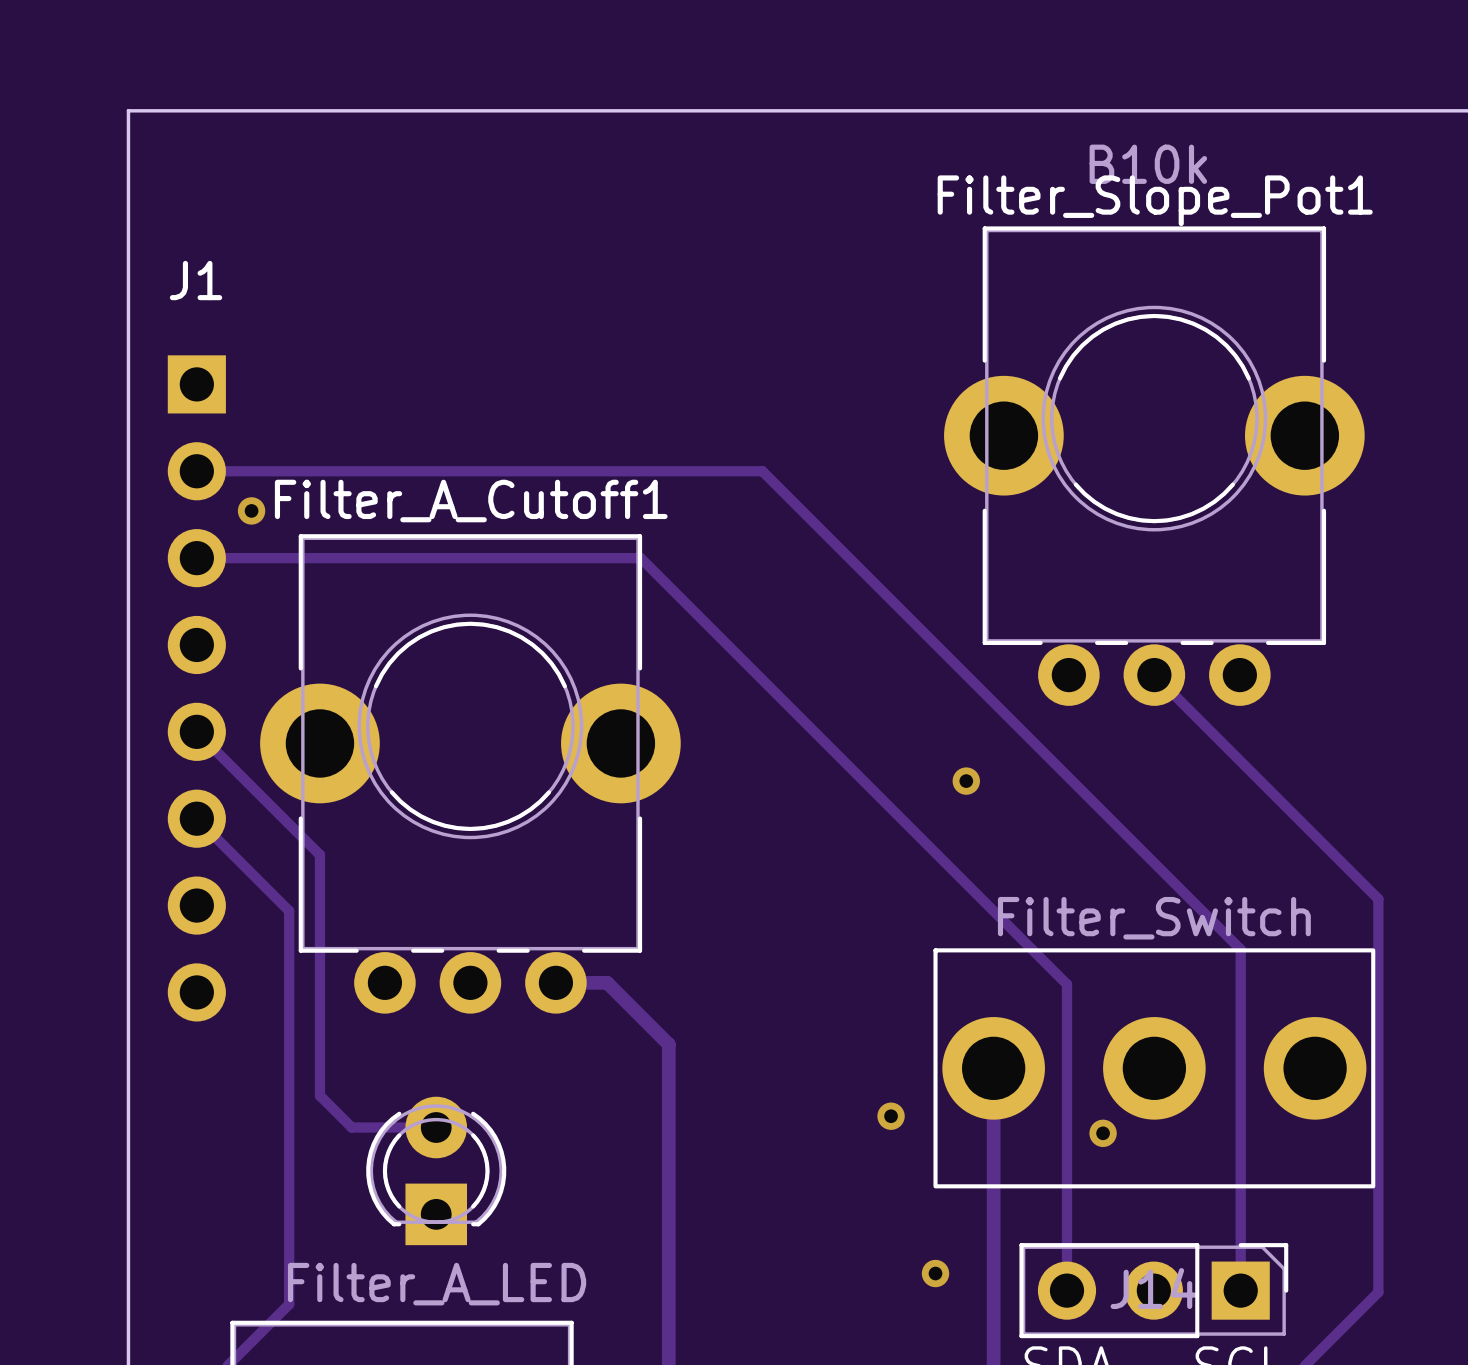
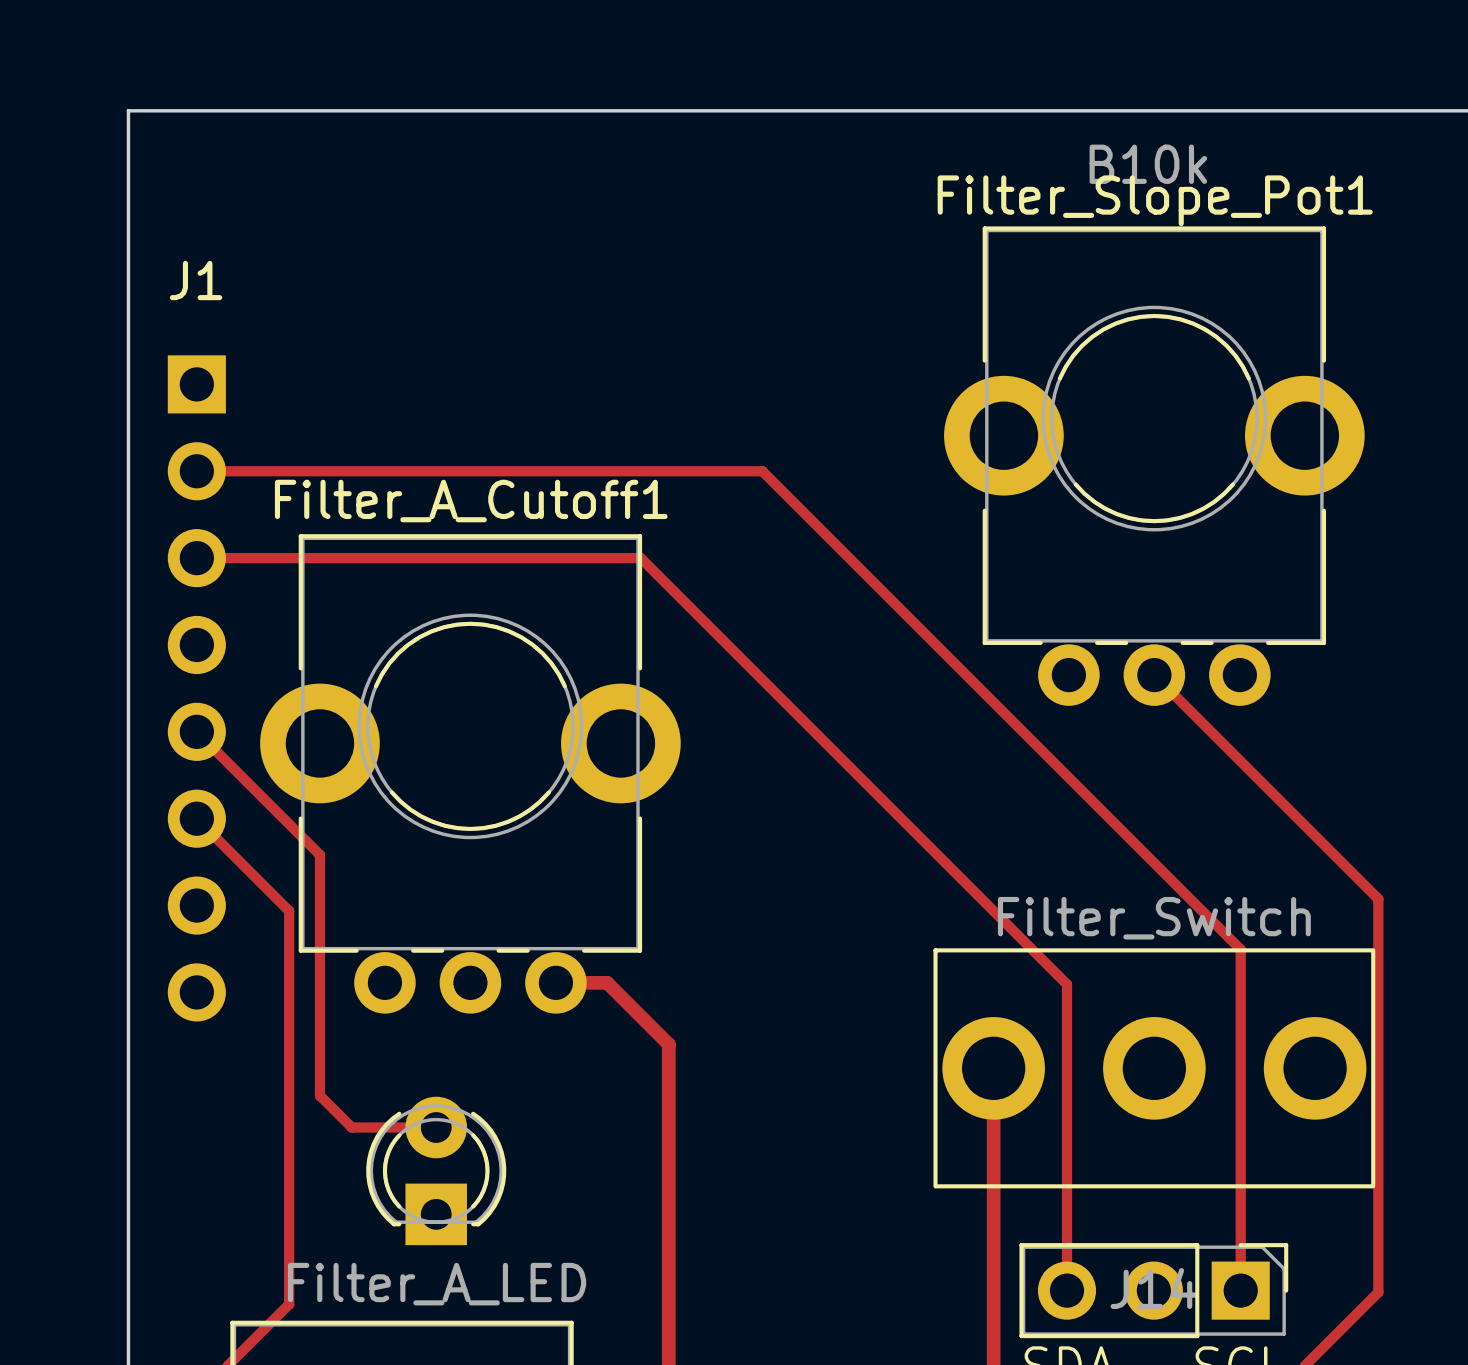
via: (251, 510) -> none
via: (966, 781) -> none
via: (891, 1116) -> none
via: (1103, 1133) -> none
via: (935, 1273) -> none

